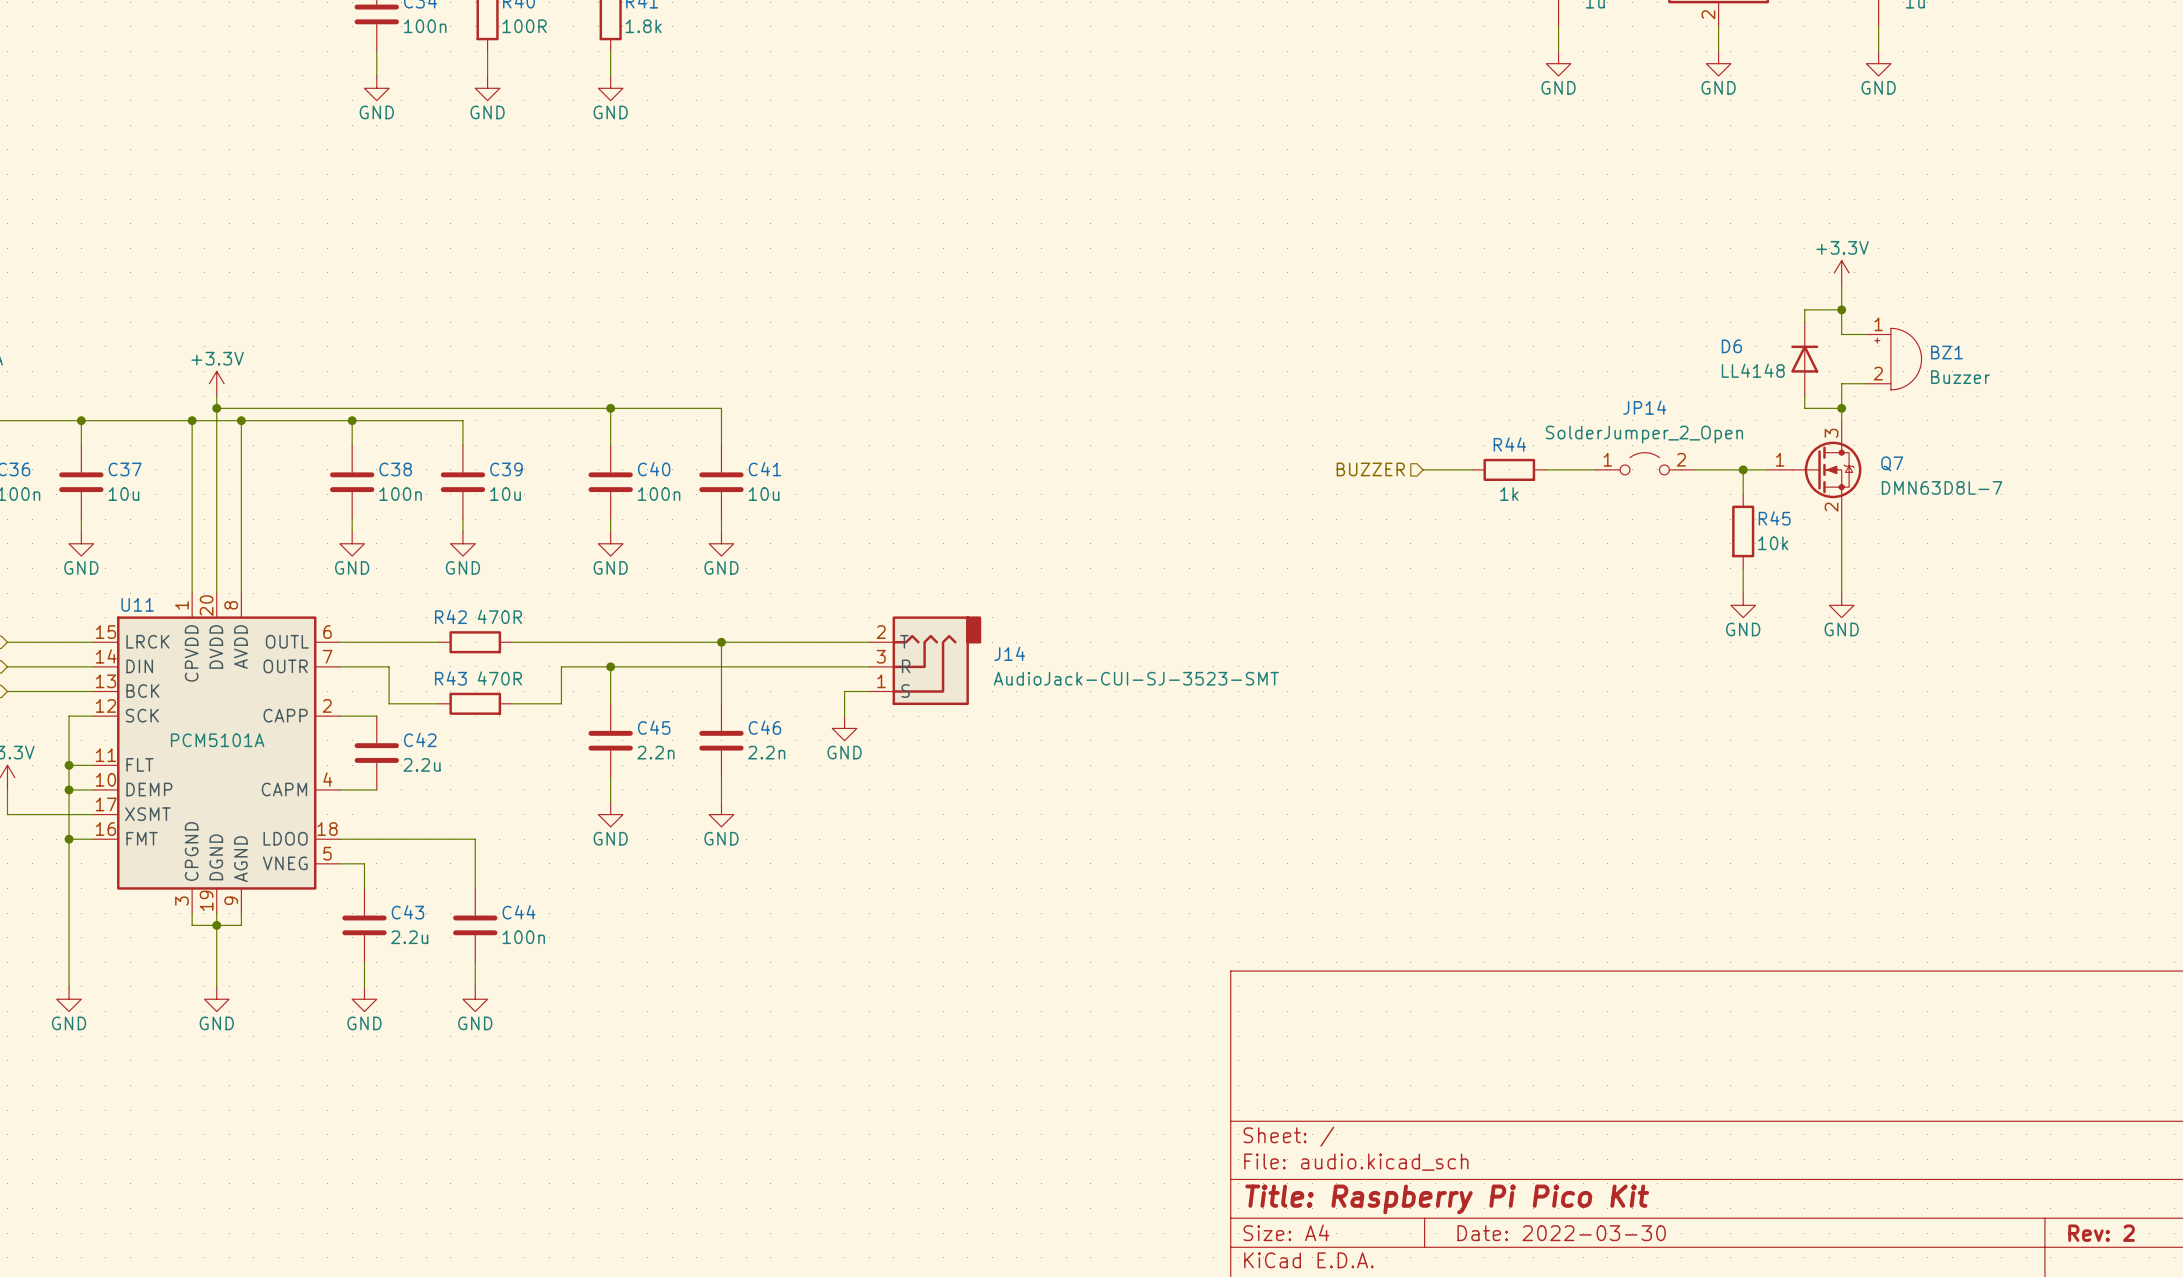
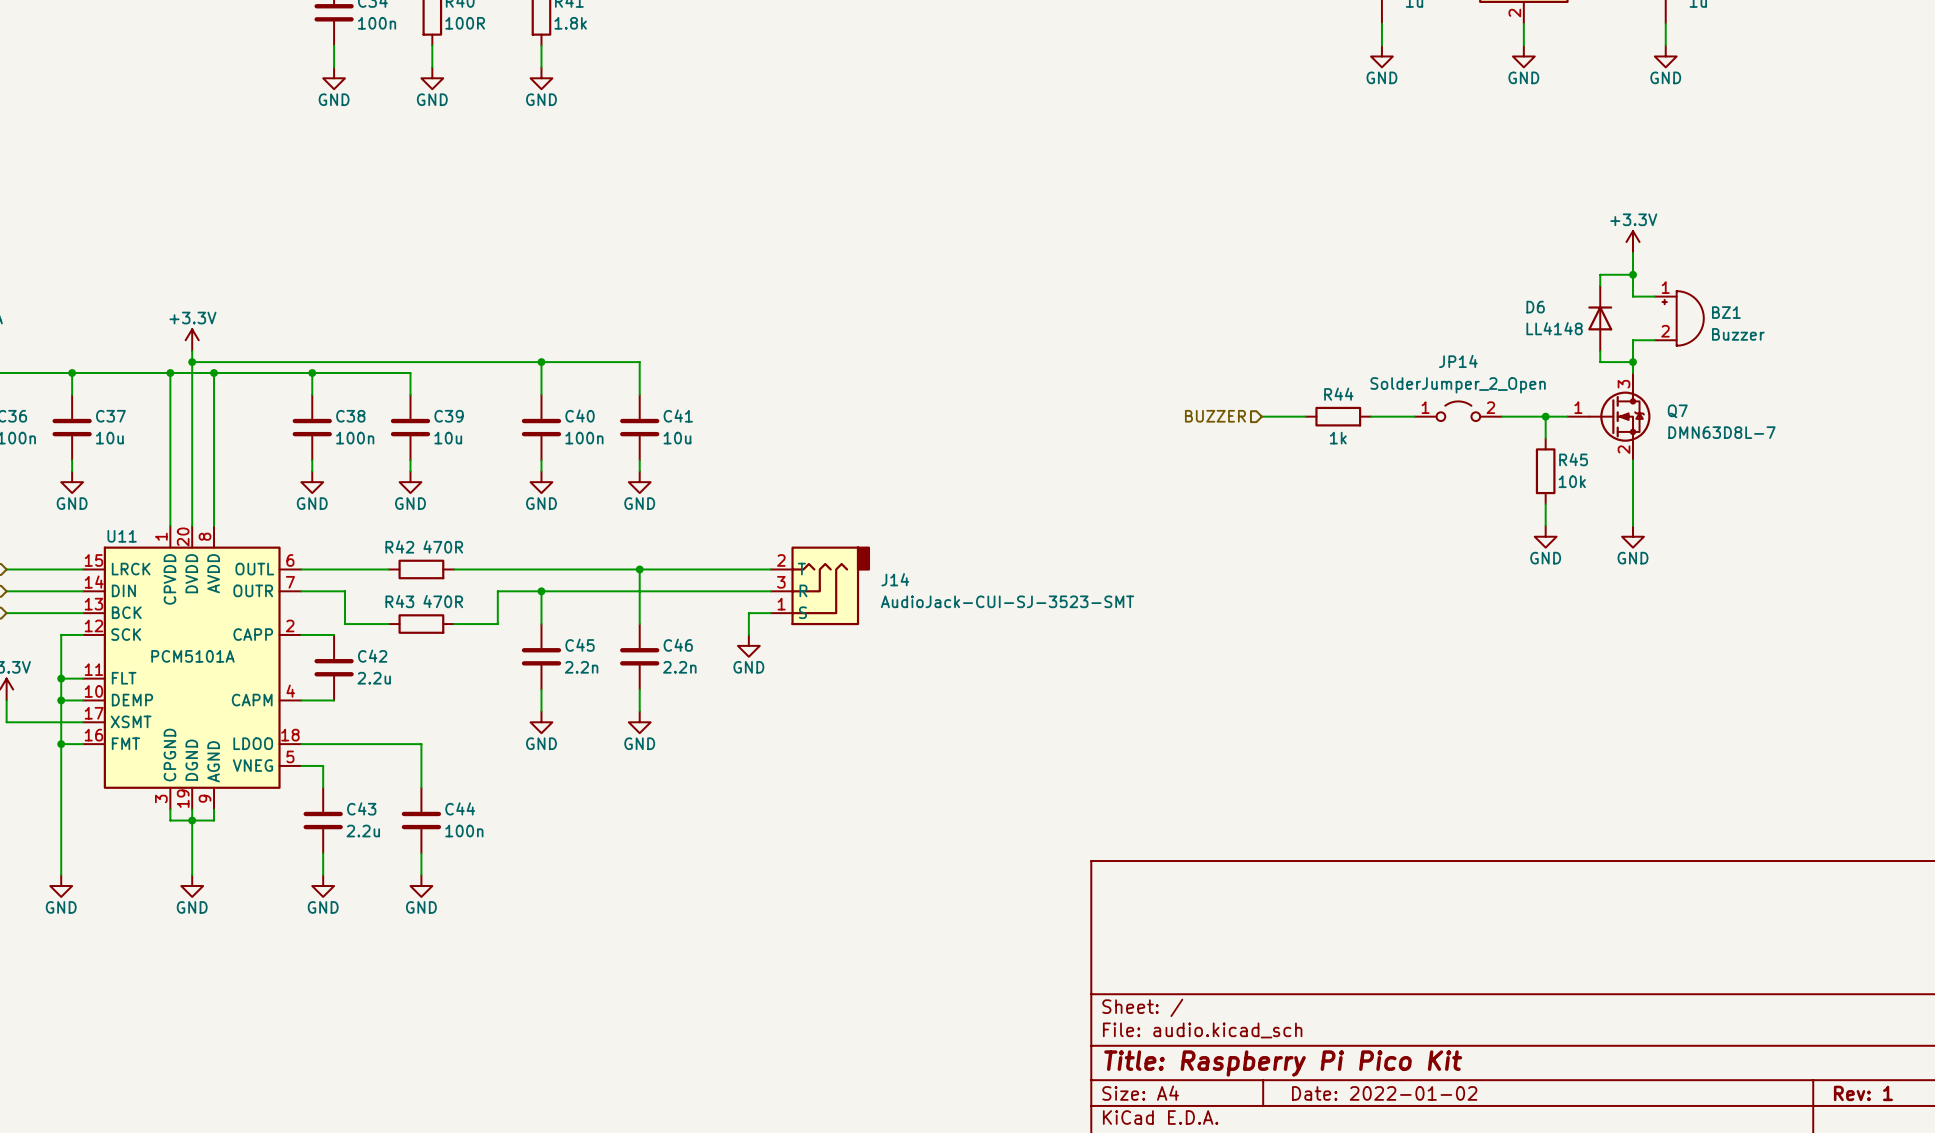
title block: Date: 2022-03-30 (1561, 1233) -> Date: 2022-01-02 (1384, 1093)
title block: Rev: 2 (2101, 1233) -> Rev: 1 (1863, 1093)

